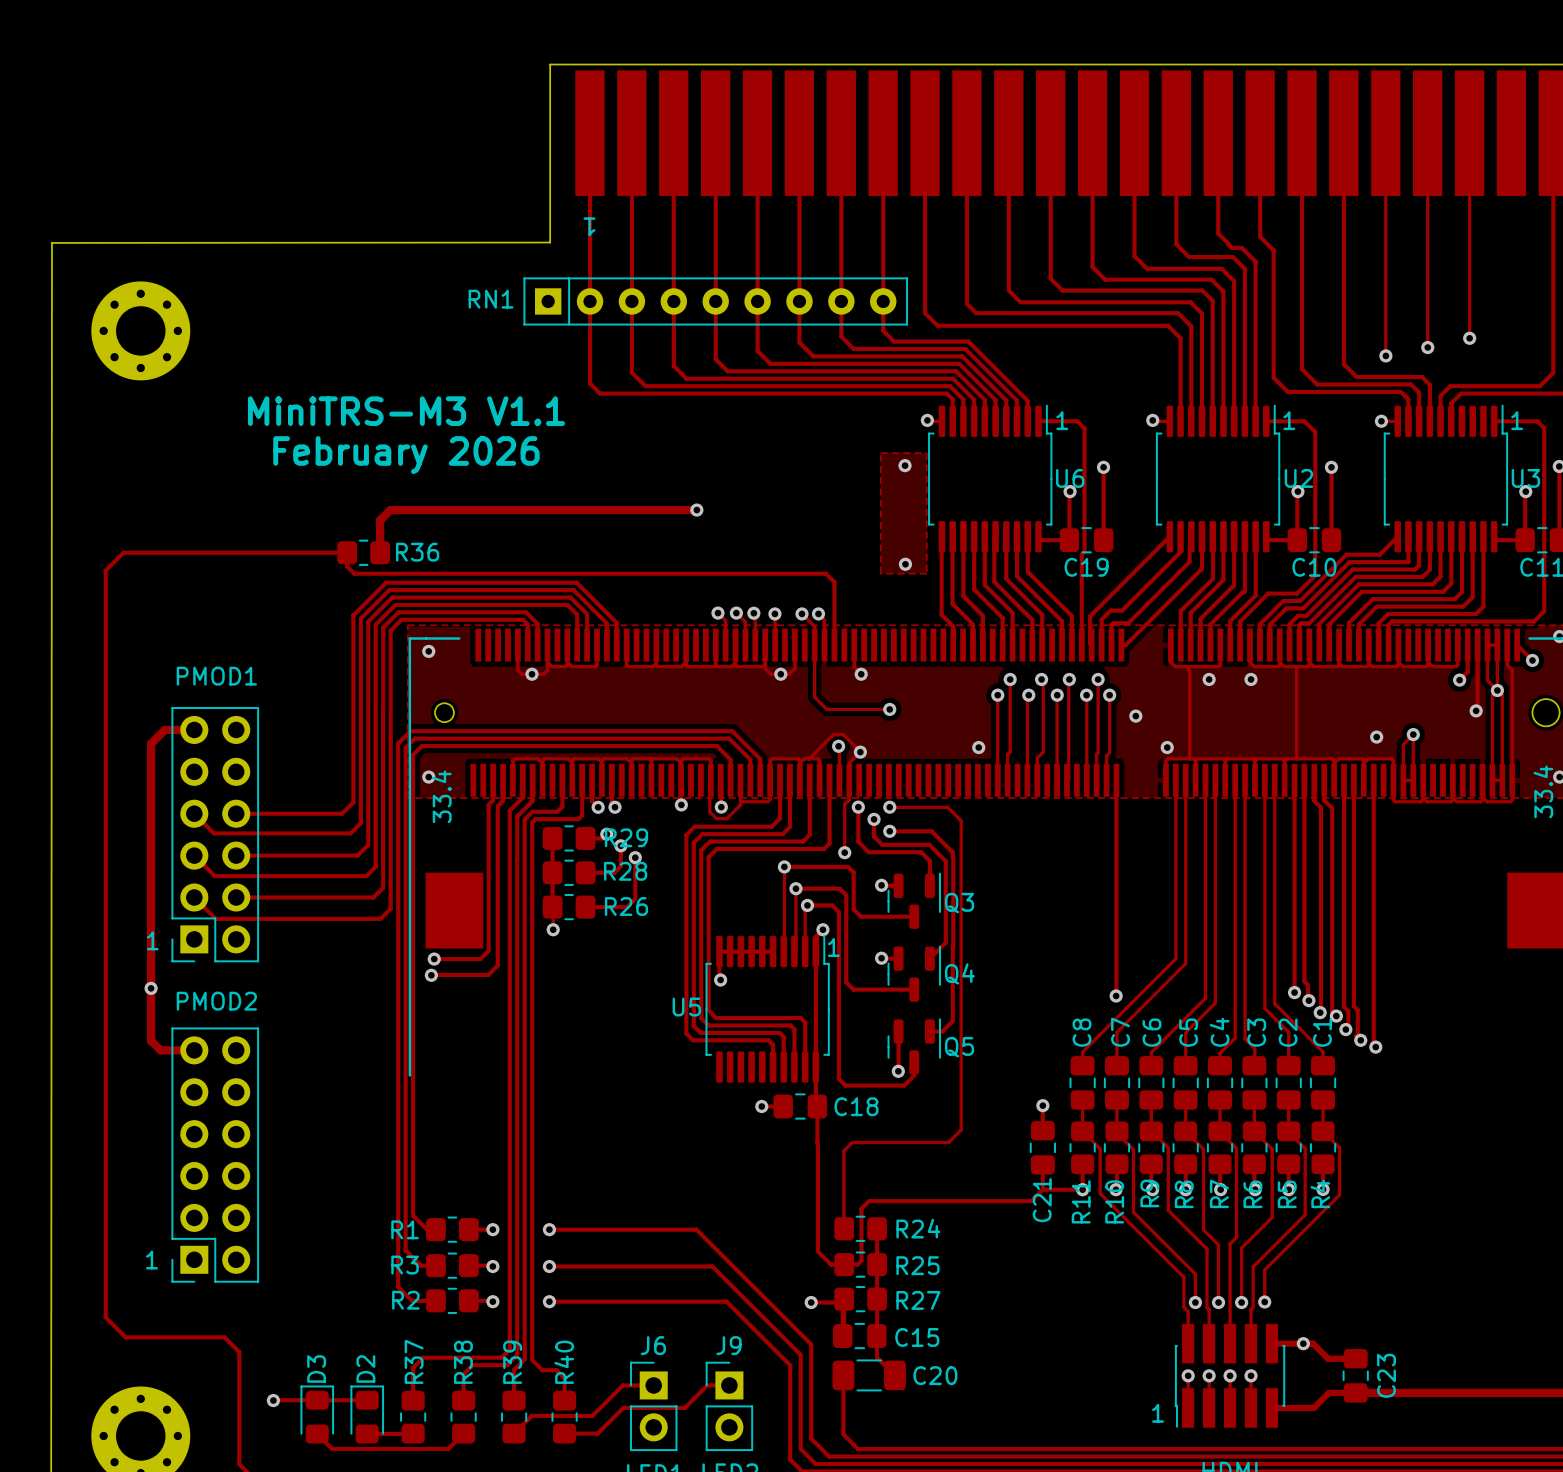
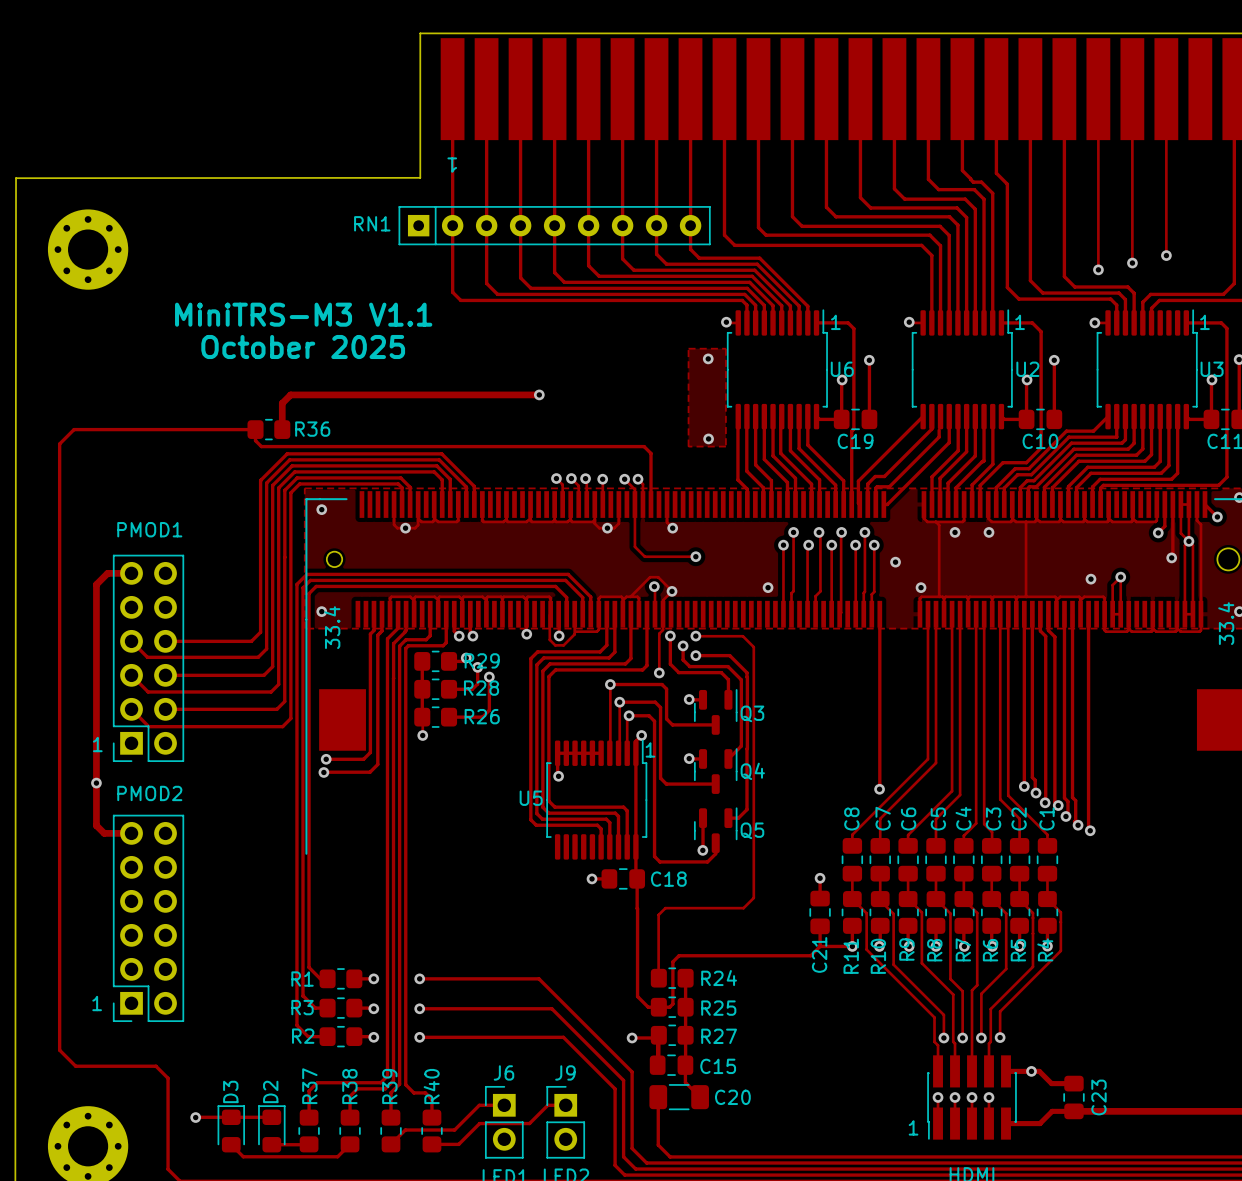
text: February 2026 (406, 455) -> October 2025 (303, 346)

